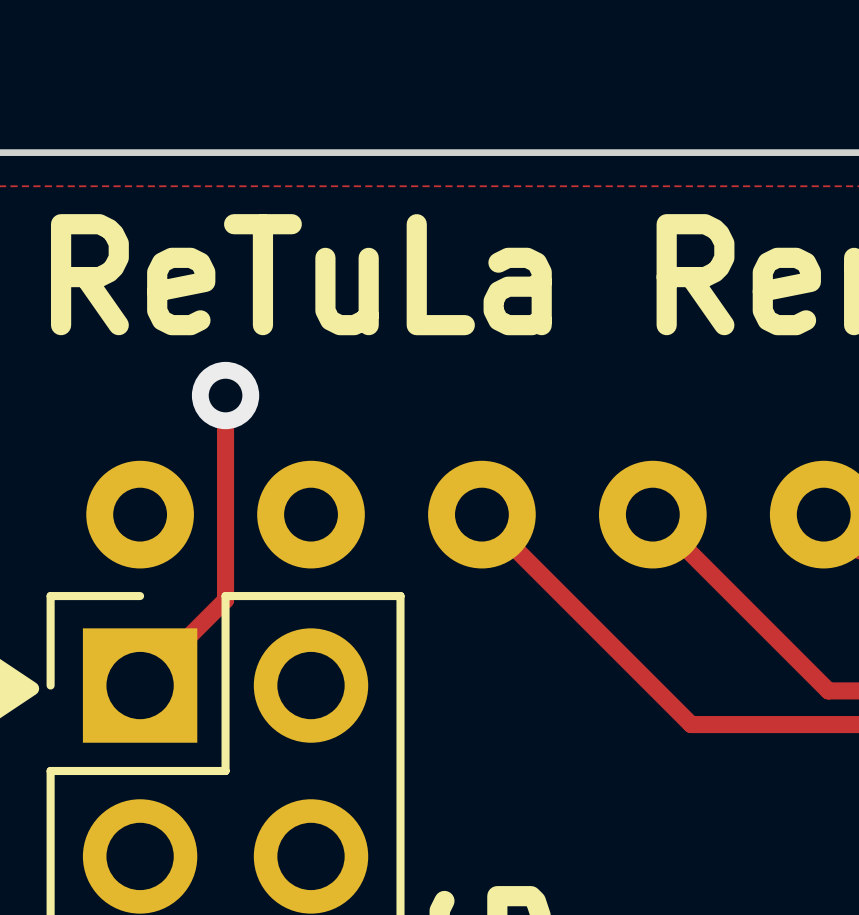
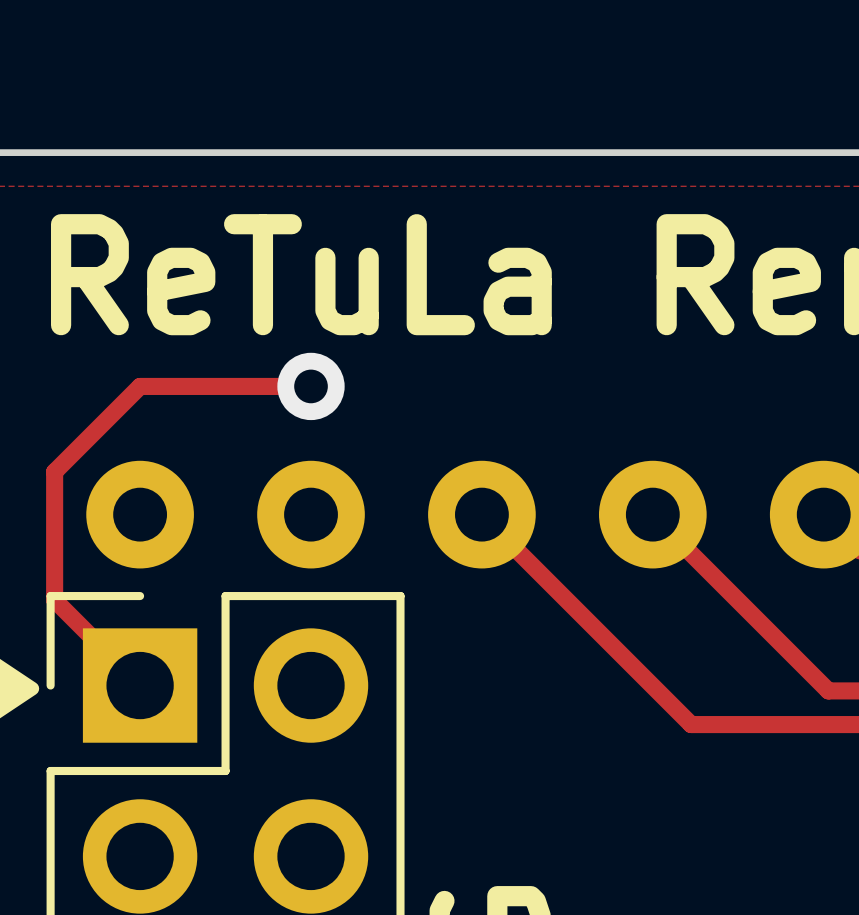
track: (225, 395) (225, 600) (140, 685) -> (311, 386) (140, 386) (54, 471) (54, 600) (140, 685)
via position: (225, 395) -> (311, 386)

